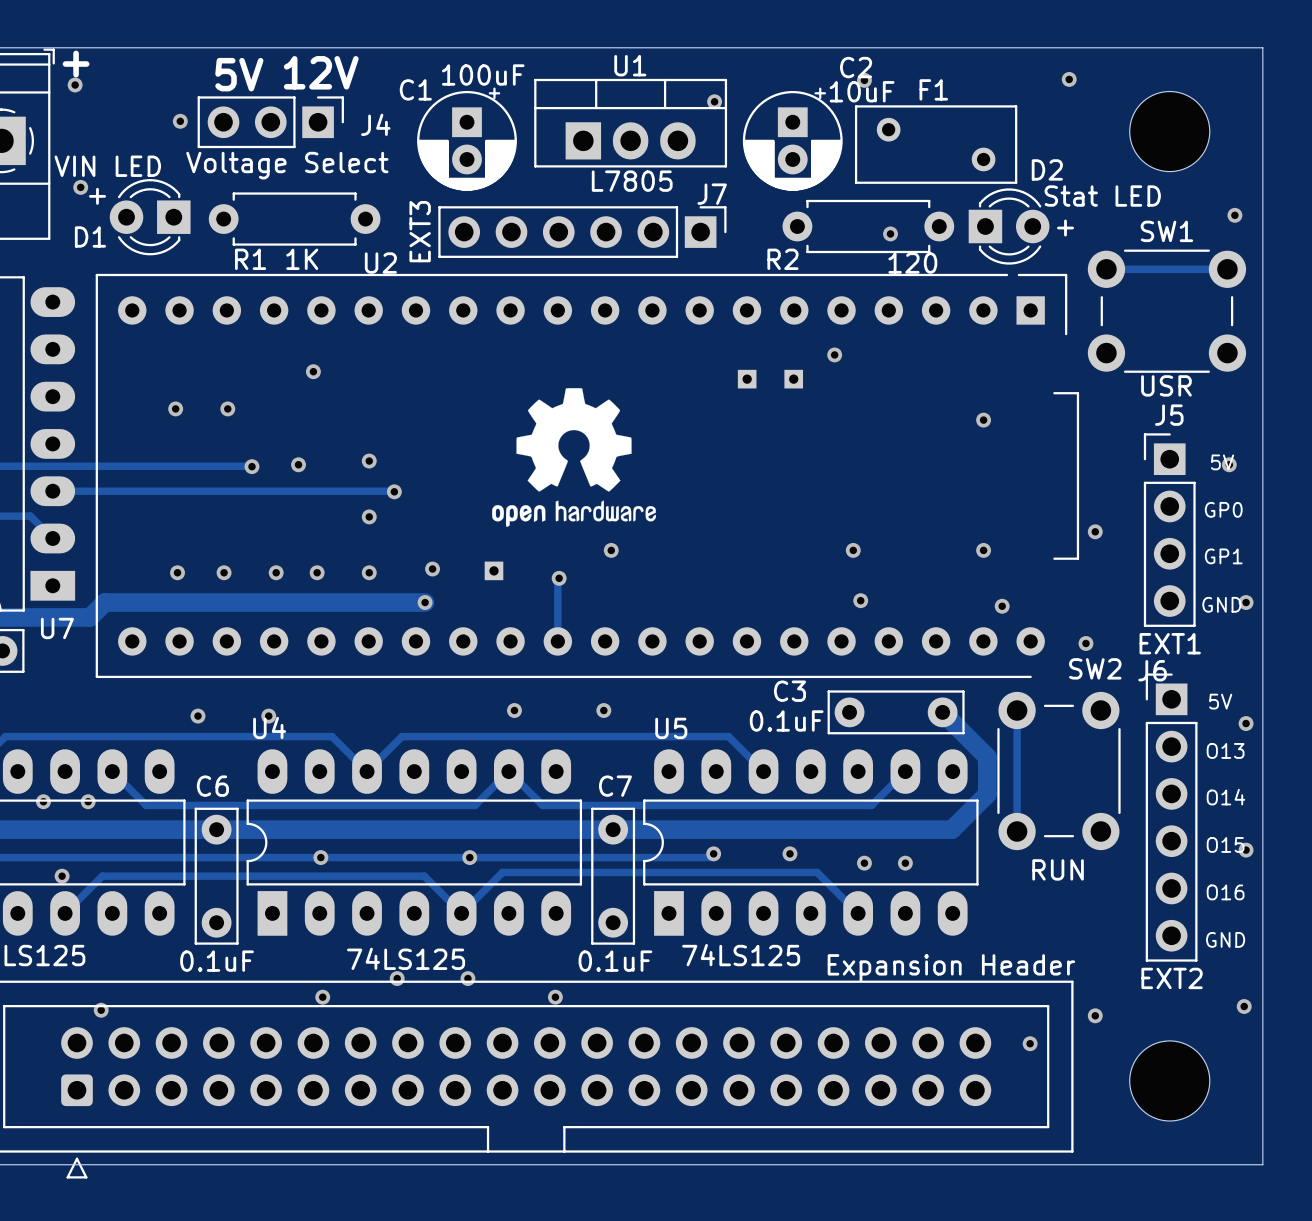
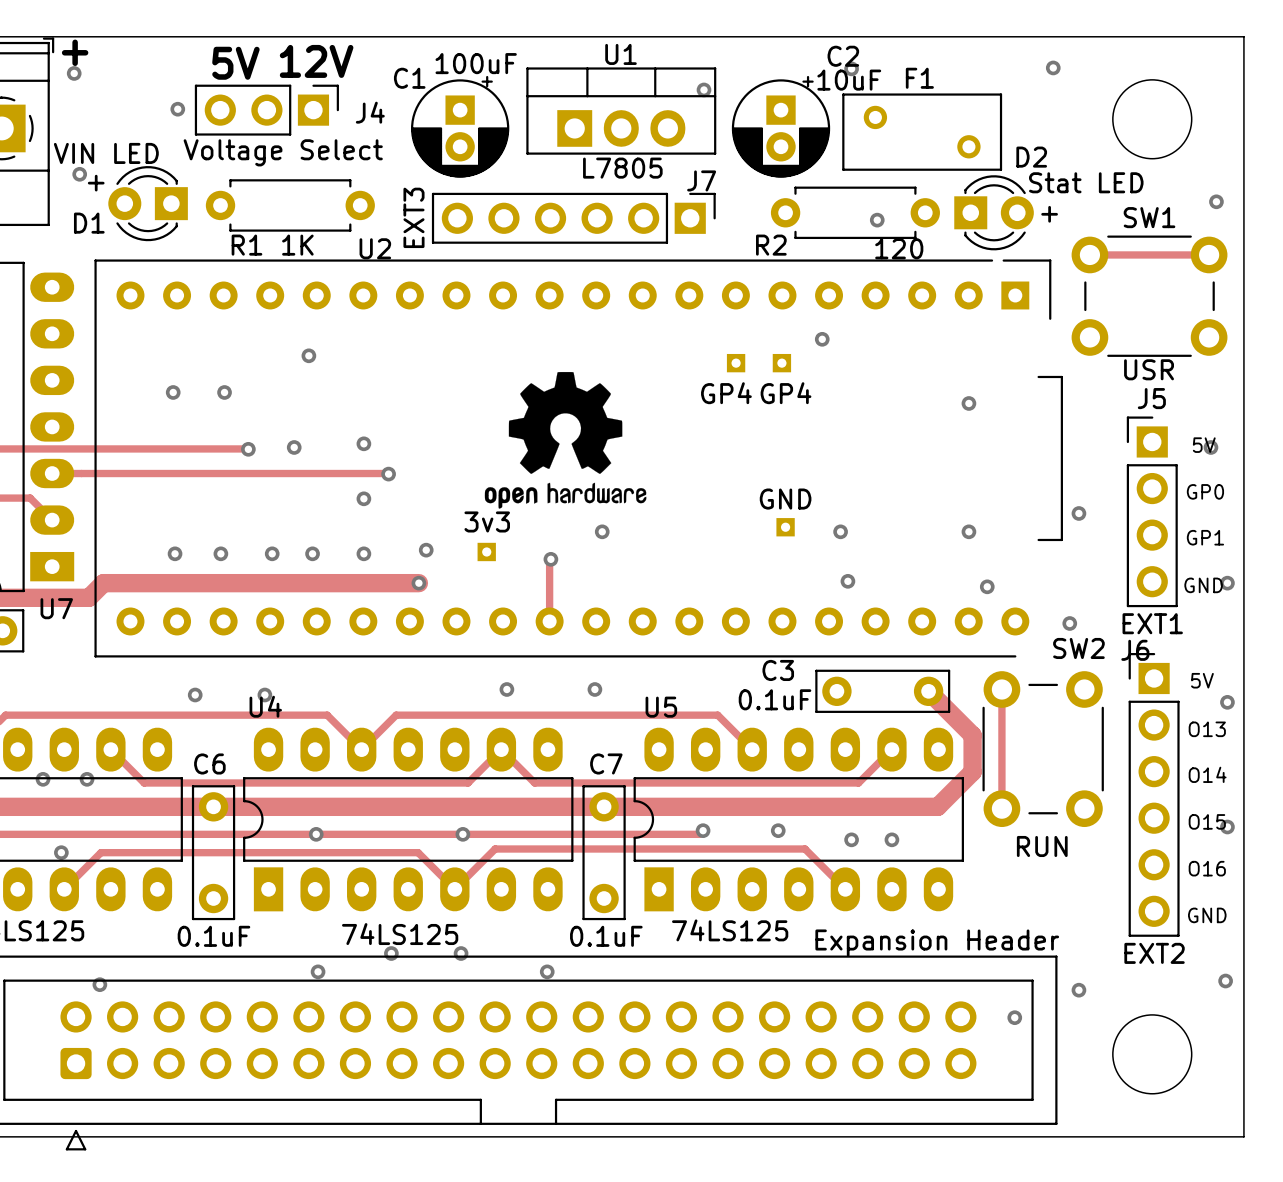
text: none -> GP4 (726, 393)
text: none -> GP4 (786, 393)
text: none -> GND (785, 499)
text: none -> 3v3 (487, 521)
part: none -> (785, 527)

